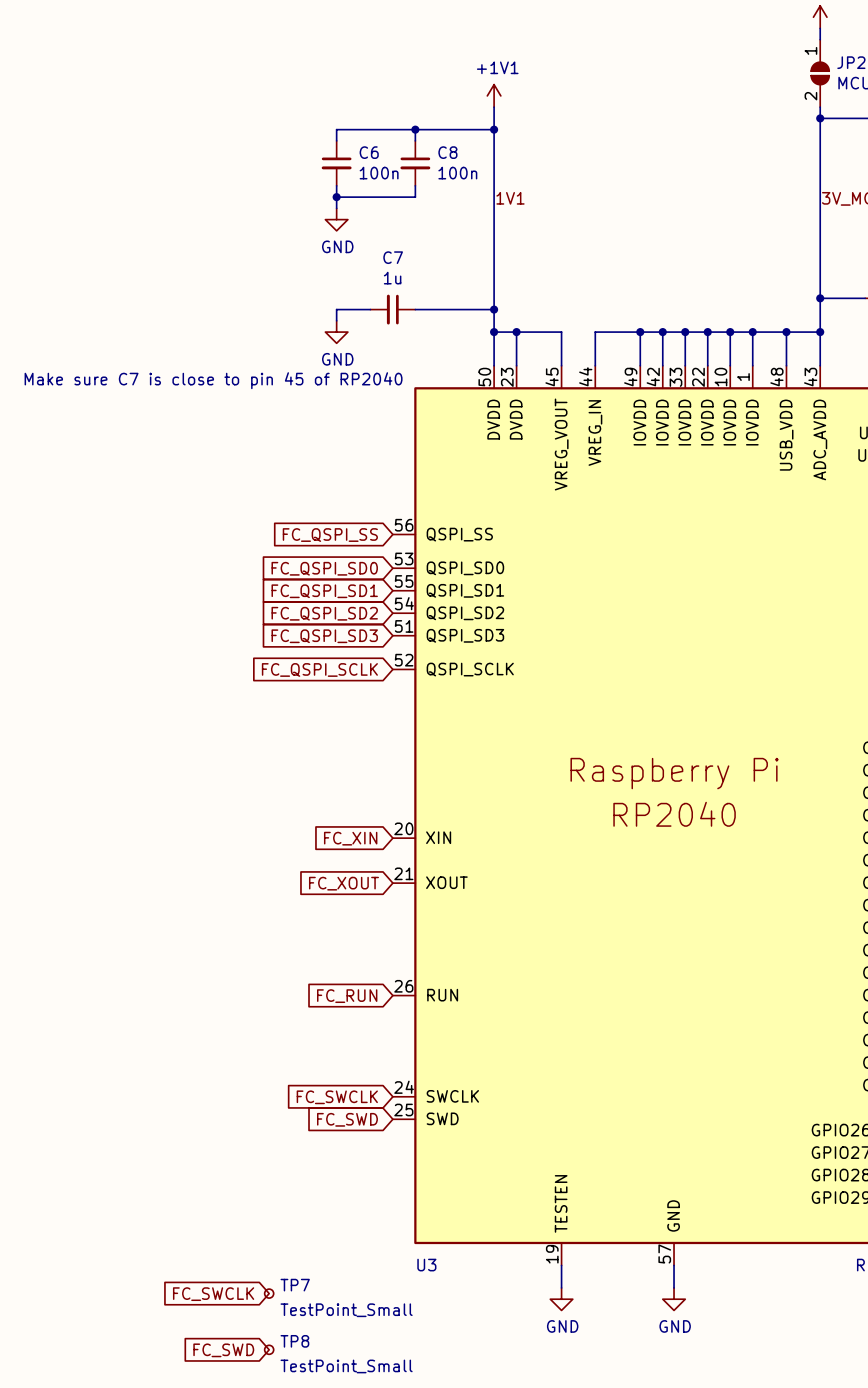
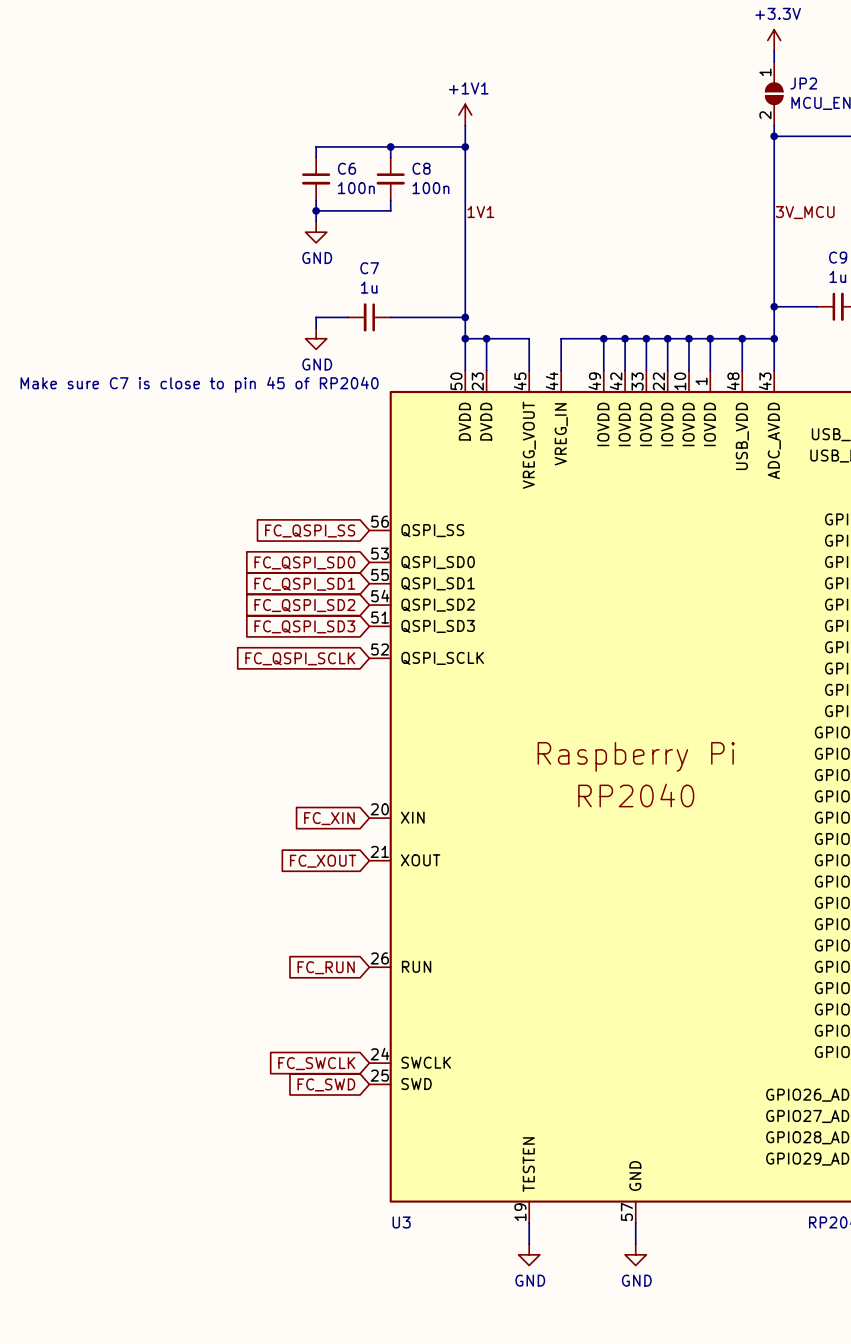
TP7: TestPoint_Small (269, 1293) -> none
global label: FC_SWCLK (213, 1294) -> none
TP8: TestPoint_Small (269, 1349) -> none
global label: FC_SWD (223, 1350) -> none

